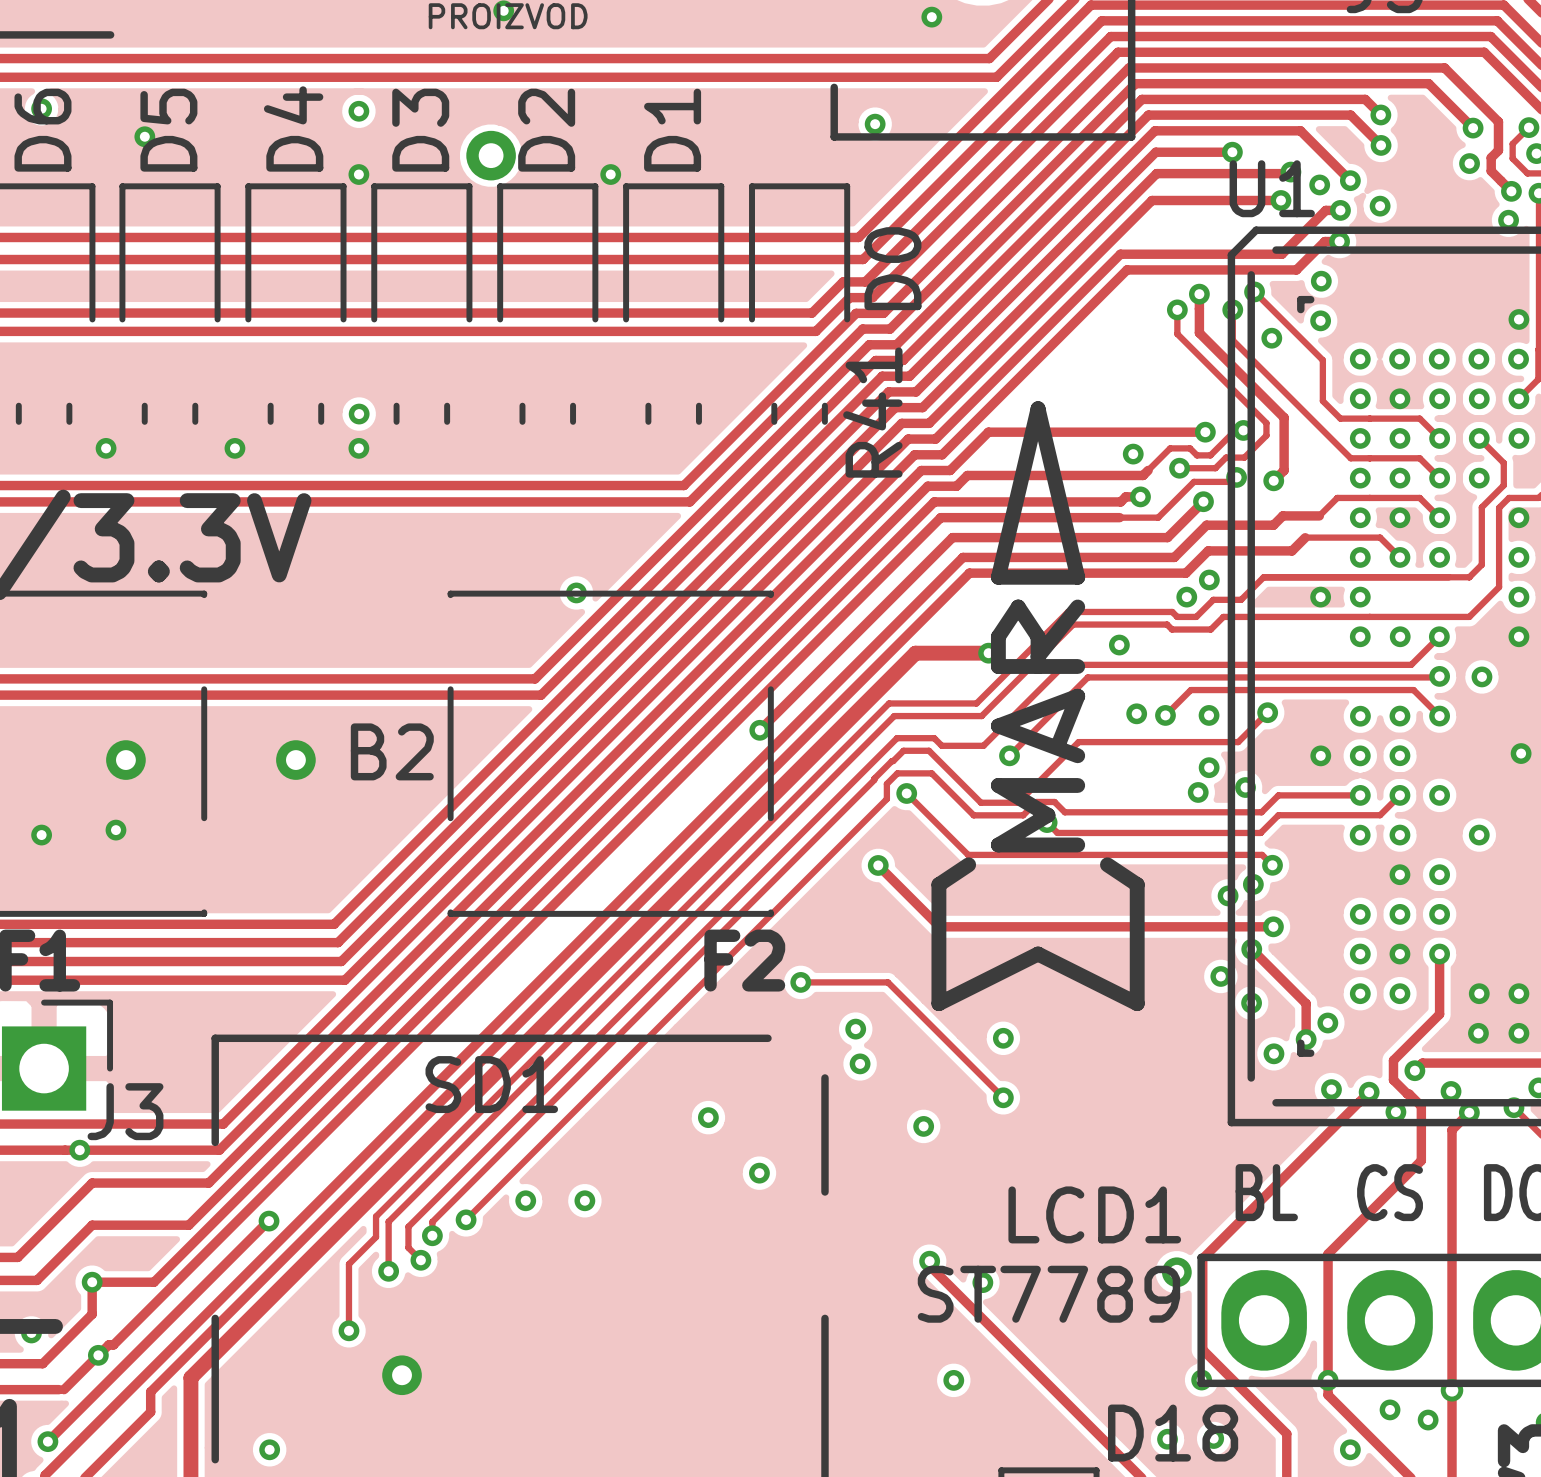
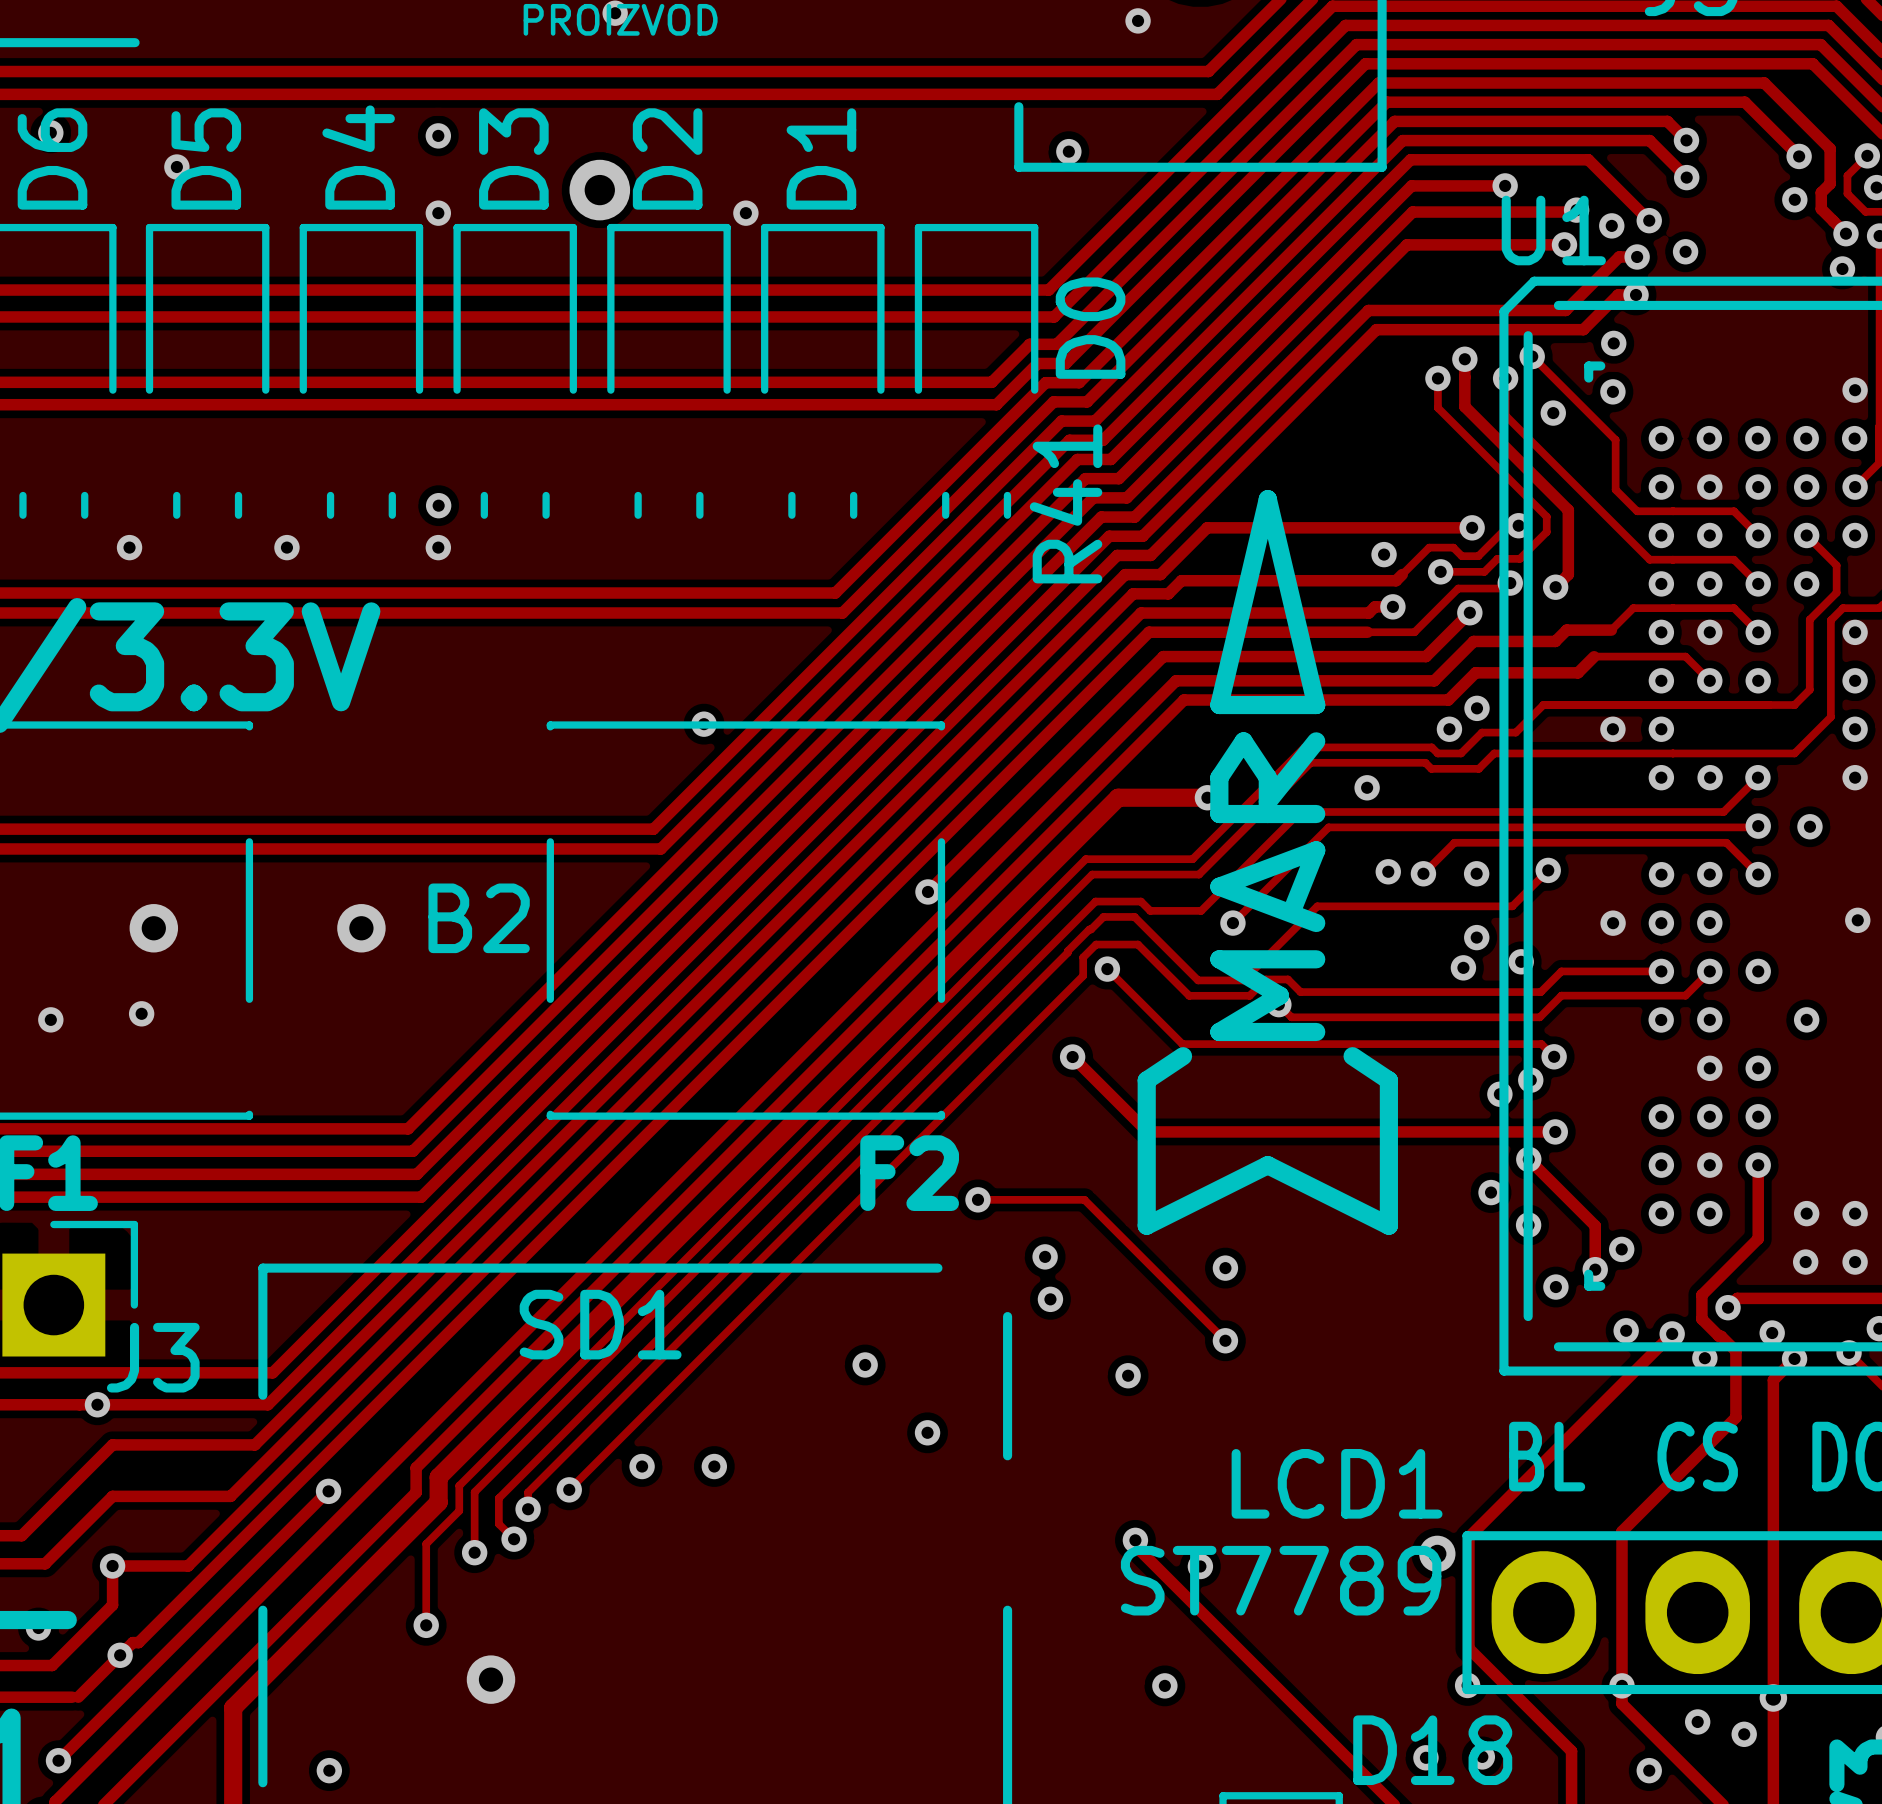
track: (340, 1201) (150, 1391) (150, 1412) -> (416, 1467) (416, 1492) (184, 1724)
track: (359, 1209) (190, 1377) (190, 1398) -> (438, 1477) (438, 1502) (233, 1707)

